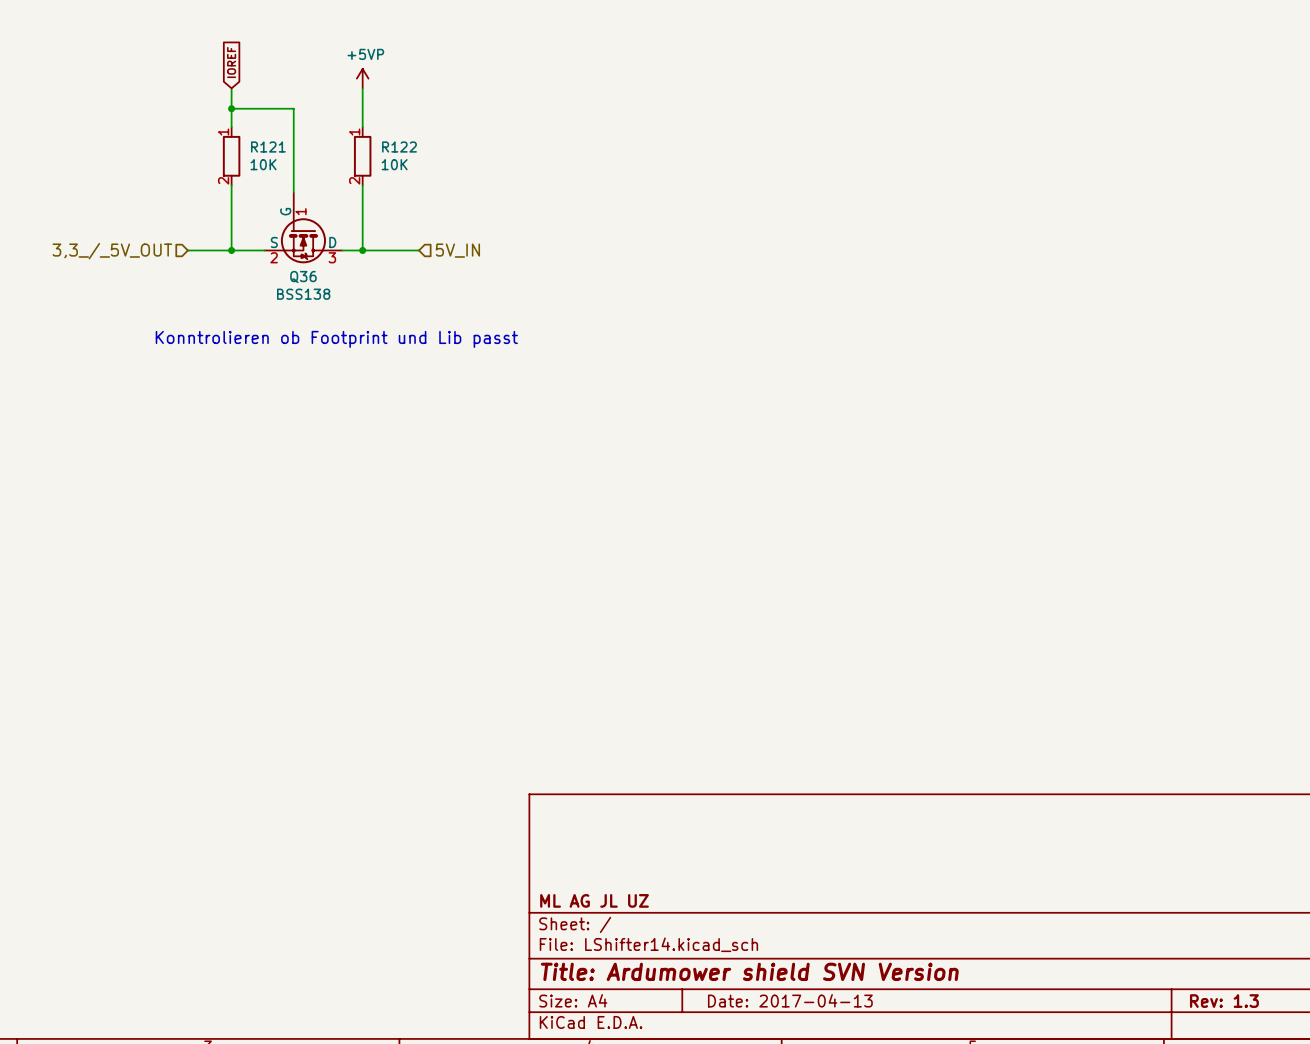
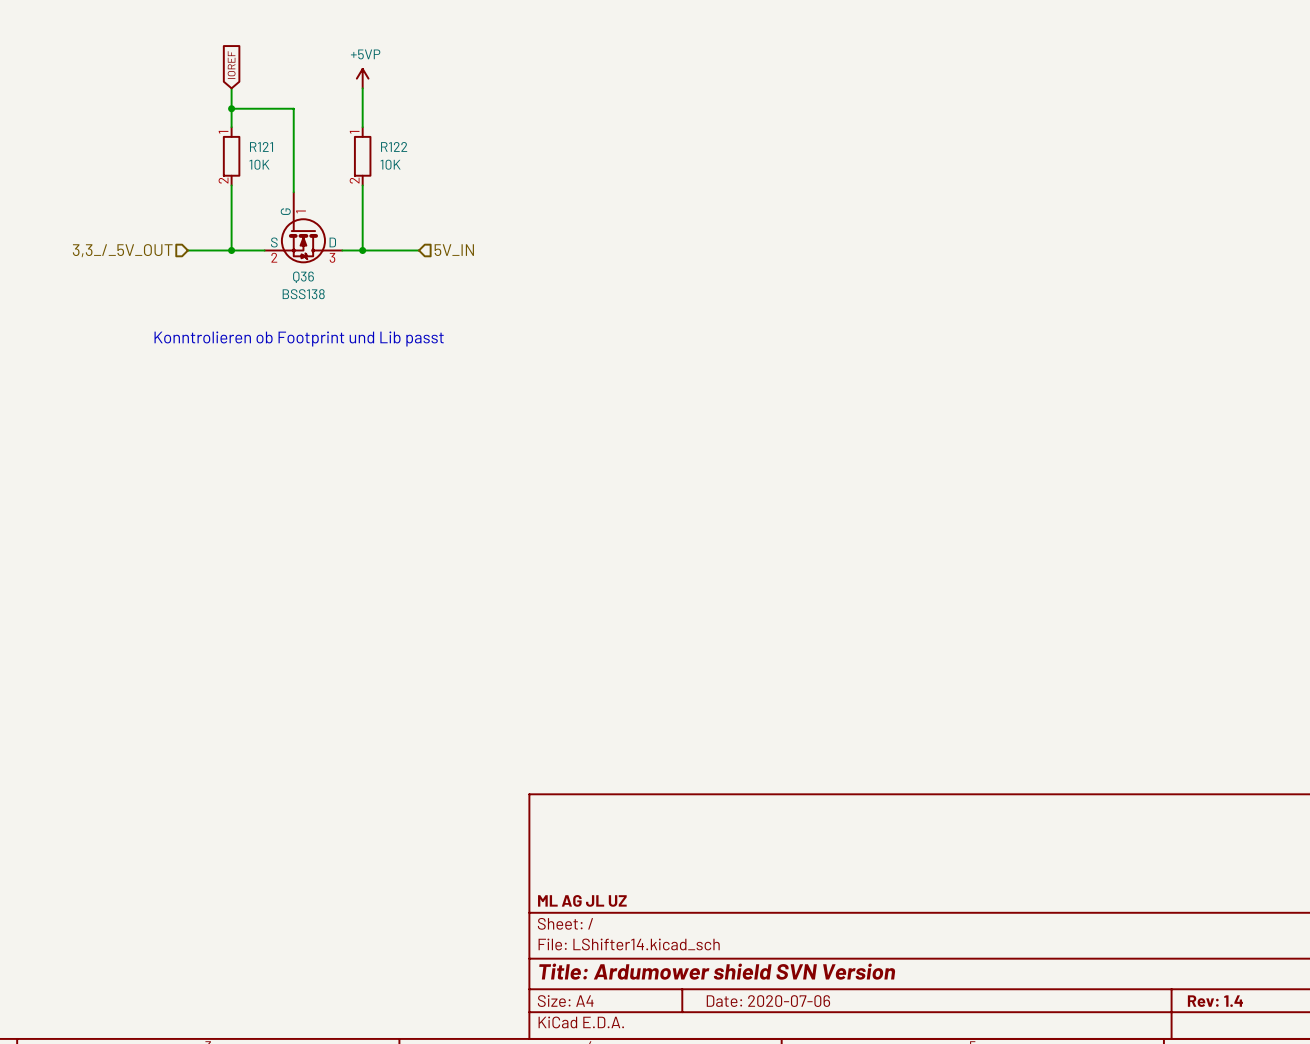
title block: Date: 2017-04-13 (790, 1000) -> Date: 2020-07-06 (768, 1001)
title block: Rev: 1.3 (1224, 1001) -> Rev: 1.4 (1215, 1001)

